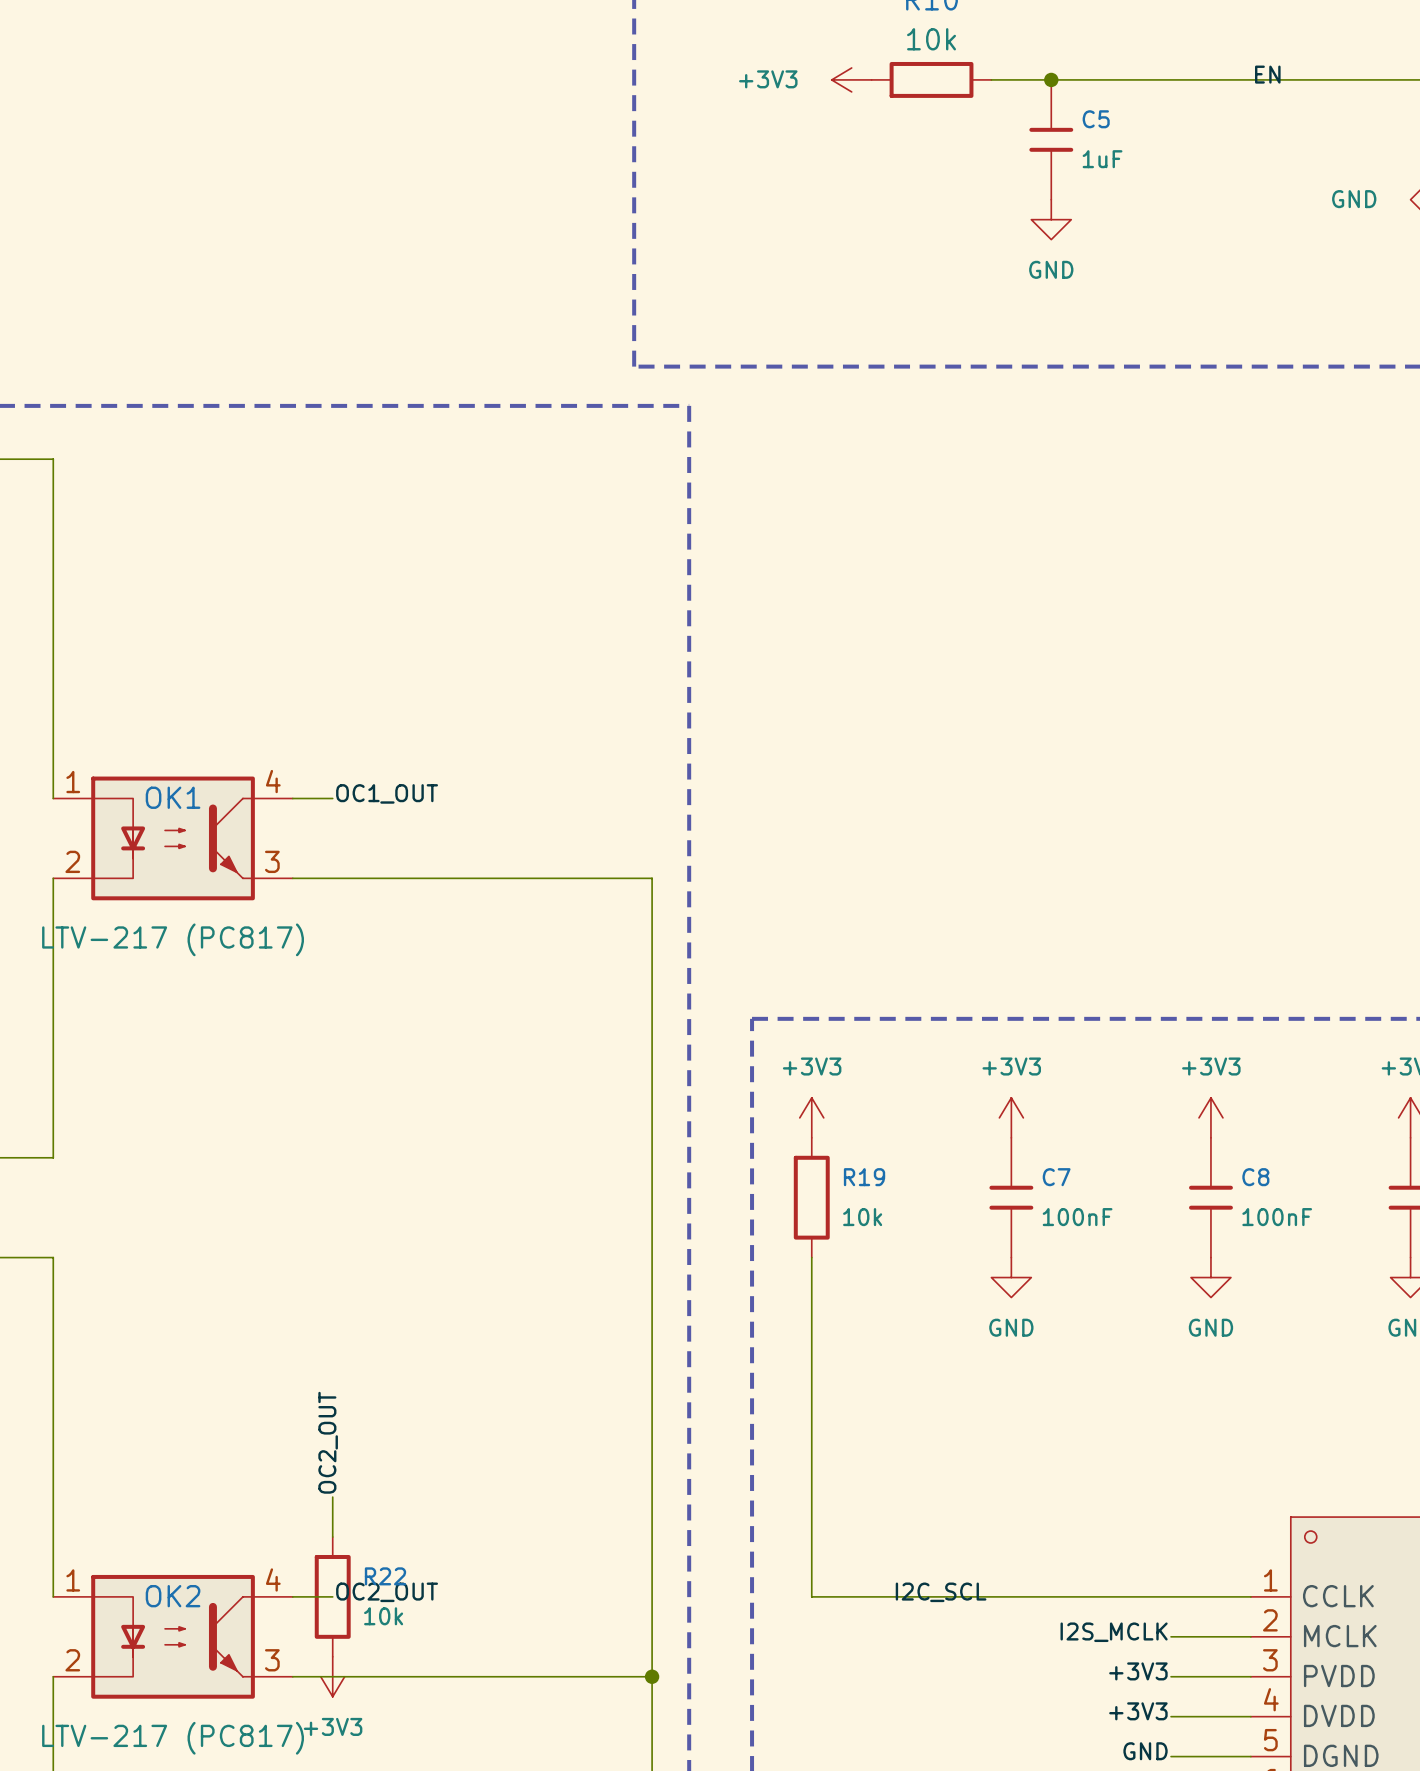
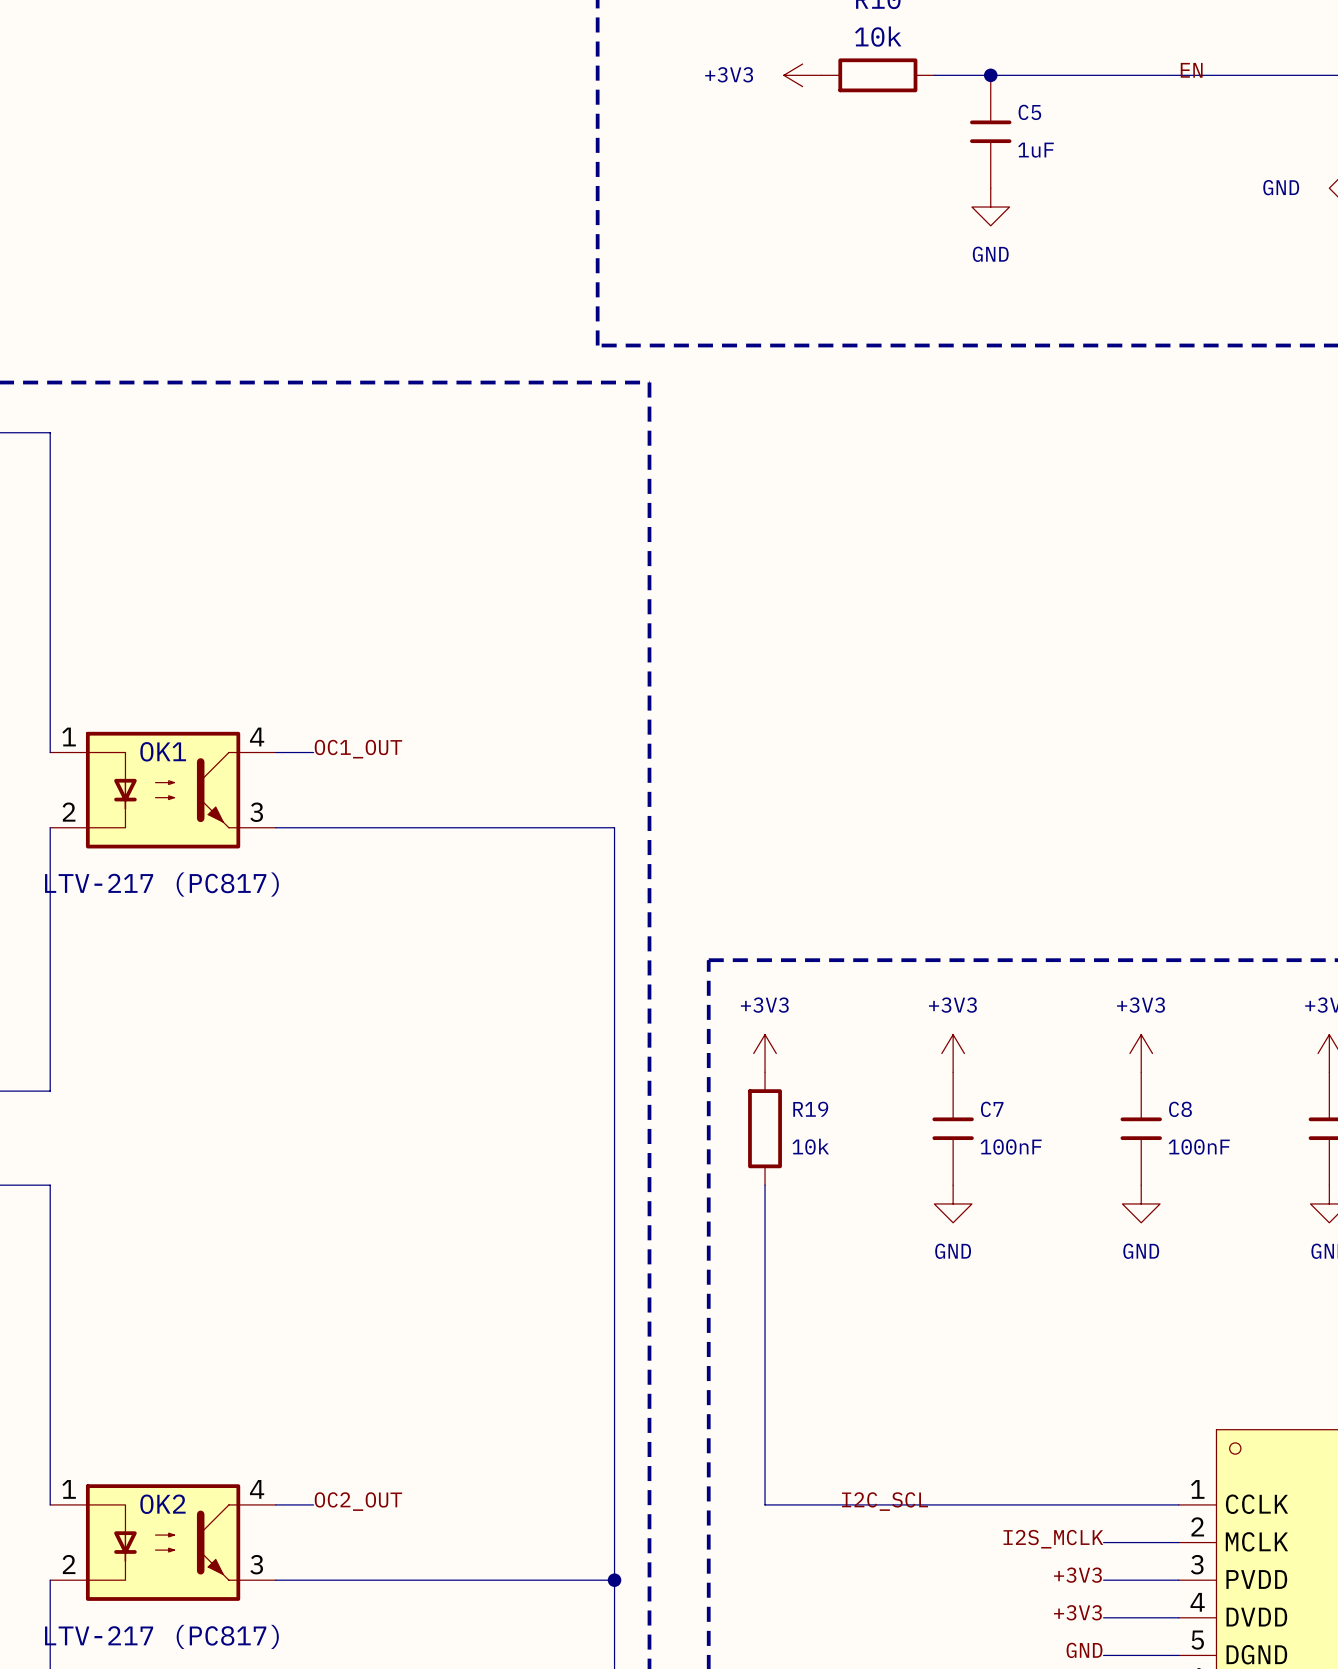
label: OC2_OUT (328, 1442) -> none
wire: (332, 1497) (332, 1537) -> none
R22: 10k (332, 1596) -> none
power symbol: +3V3 (332, 1676) -> none

